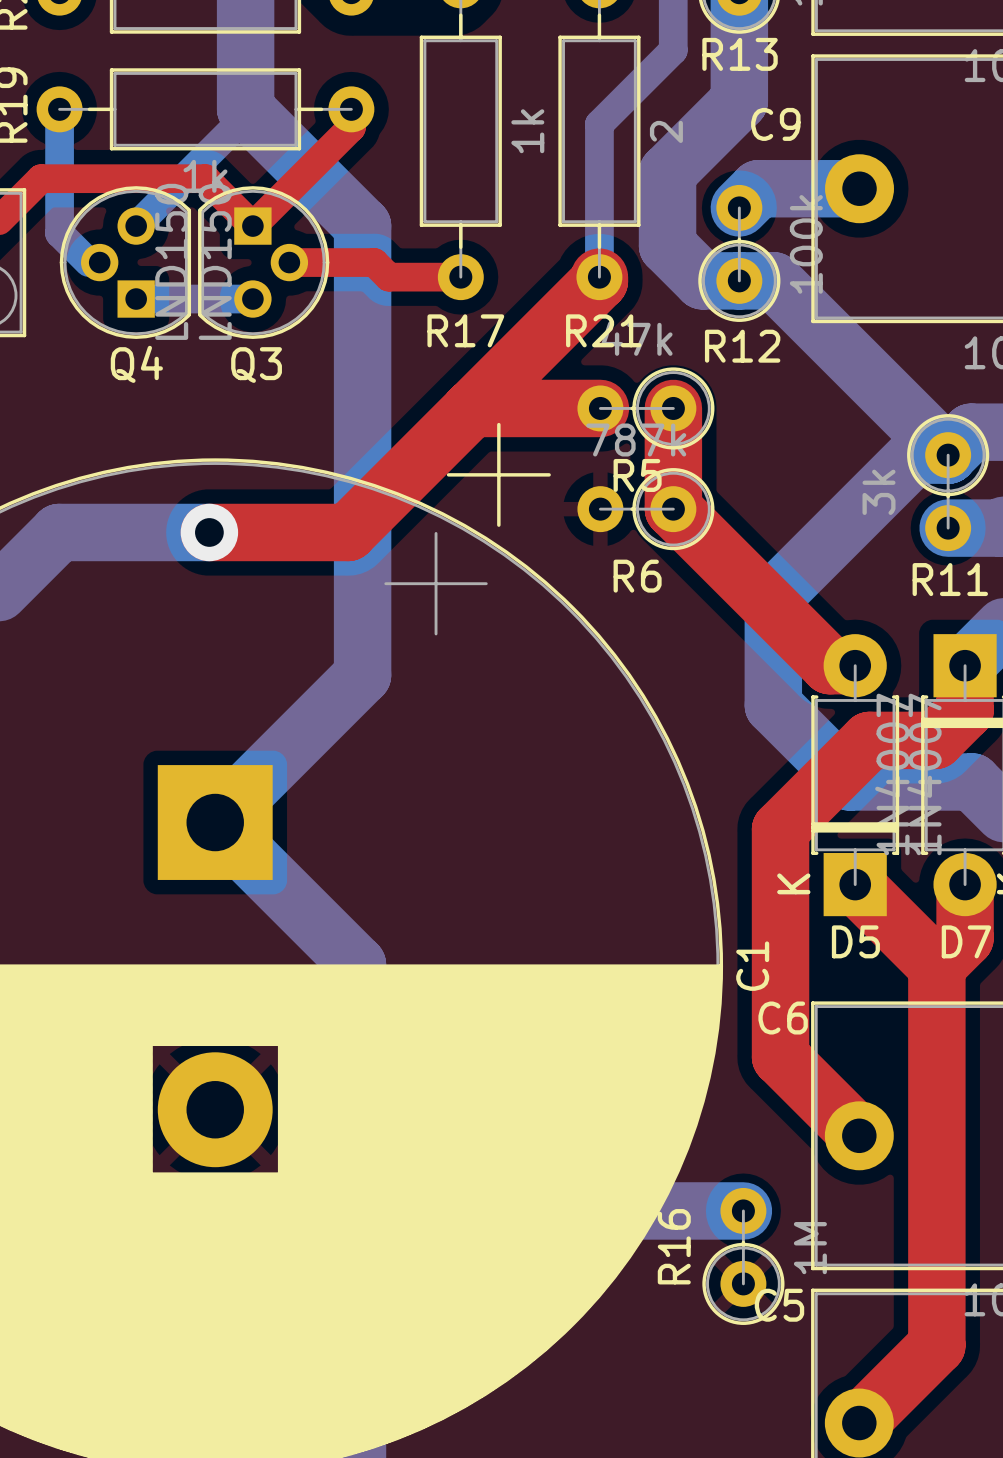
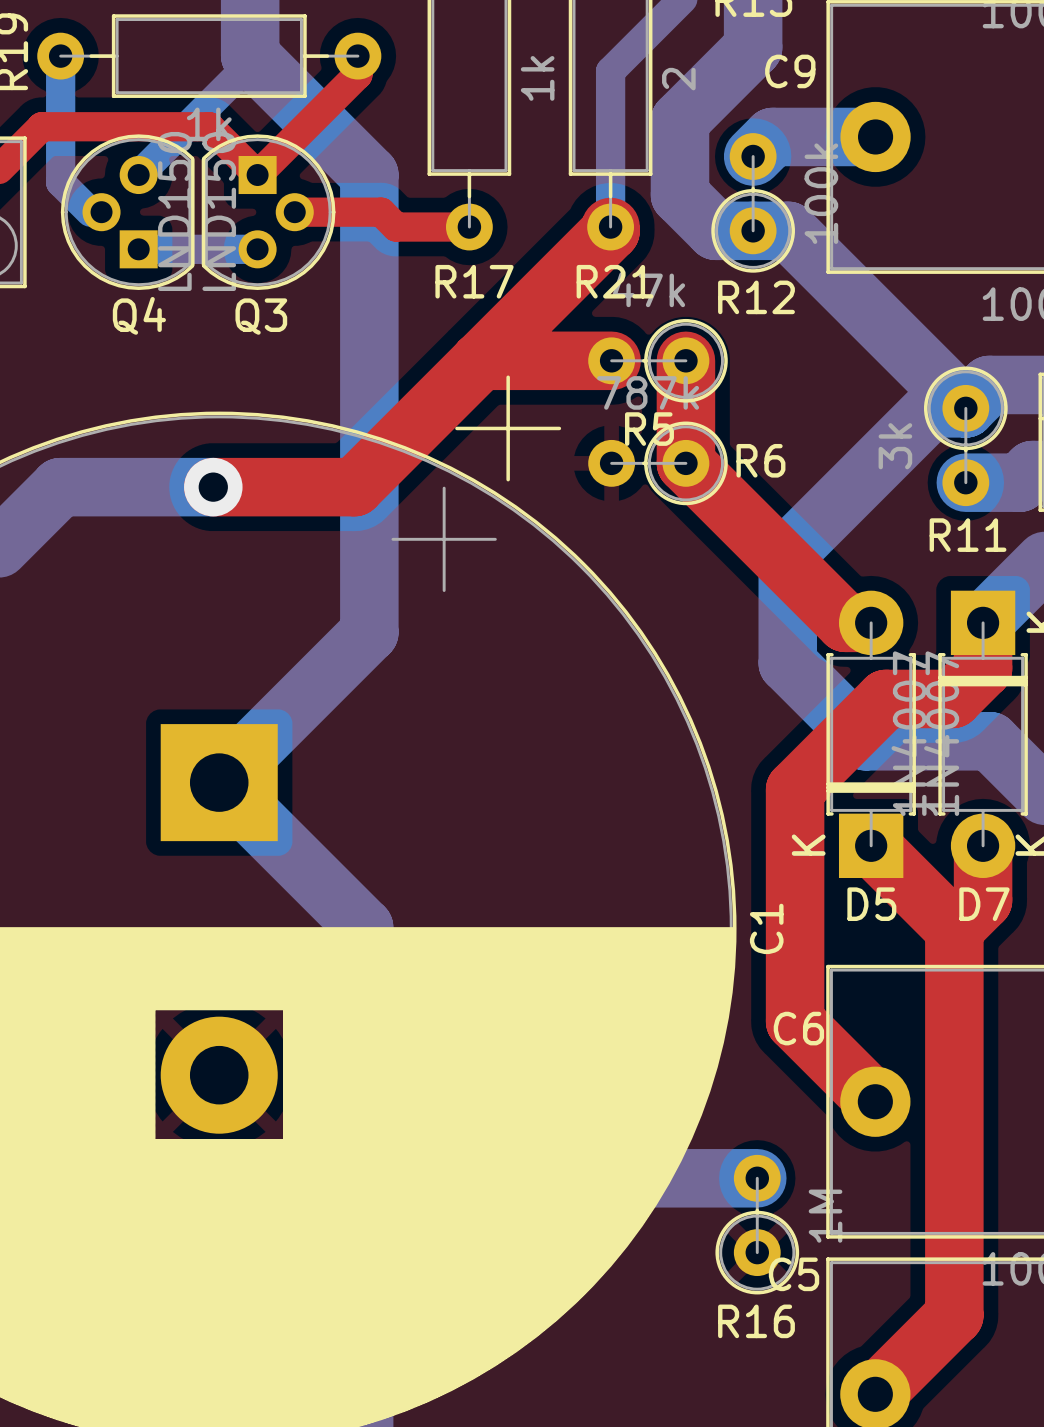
R6 name position: R6 (637, 576) -> R6 (760, 460)
C6 name position: C6 (783, 1018) -> C6 (798, 1028)
R16 name rotation: 0° (674, 1246) -> 90° clockwise (756, 1321)
R16 name position: R16 (674, 1246) -> R16 (756, 1321)

